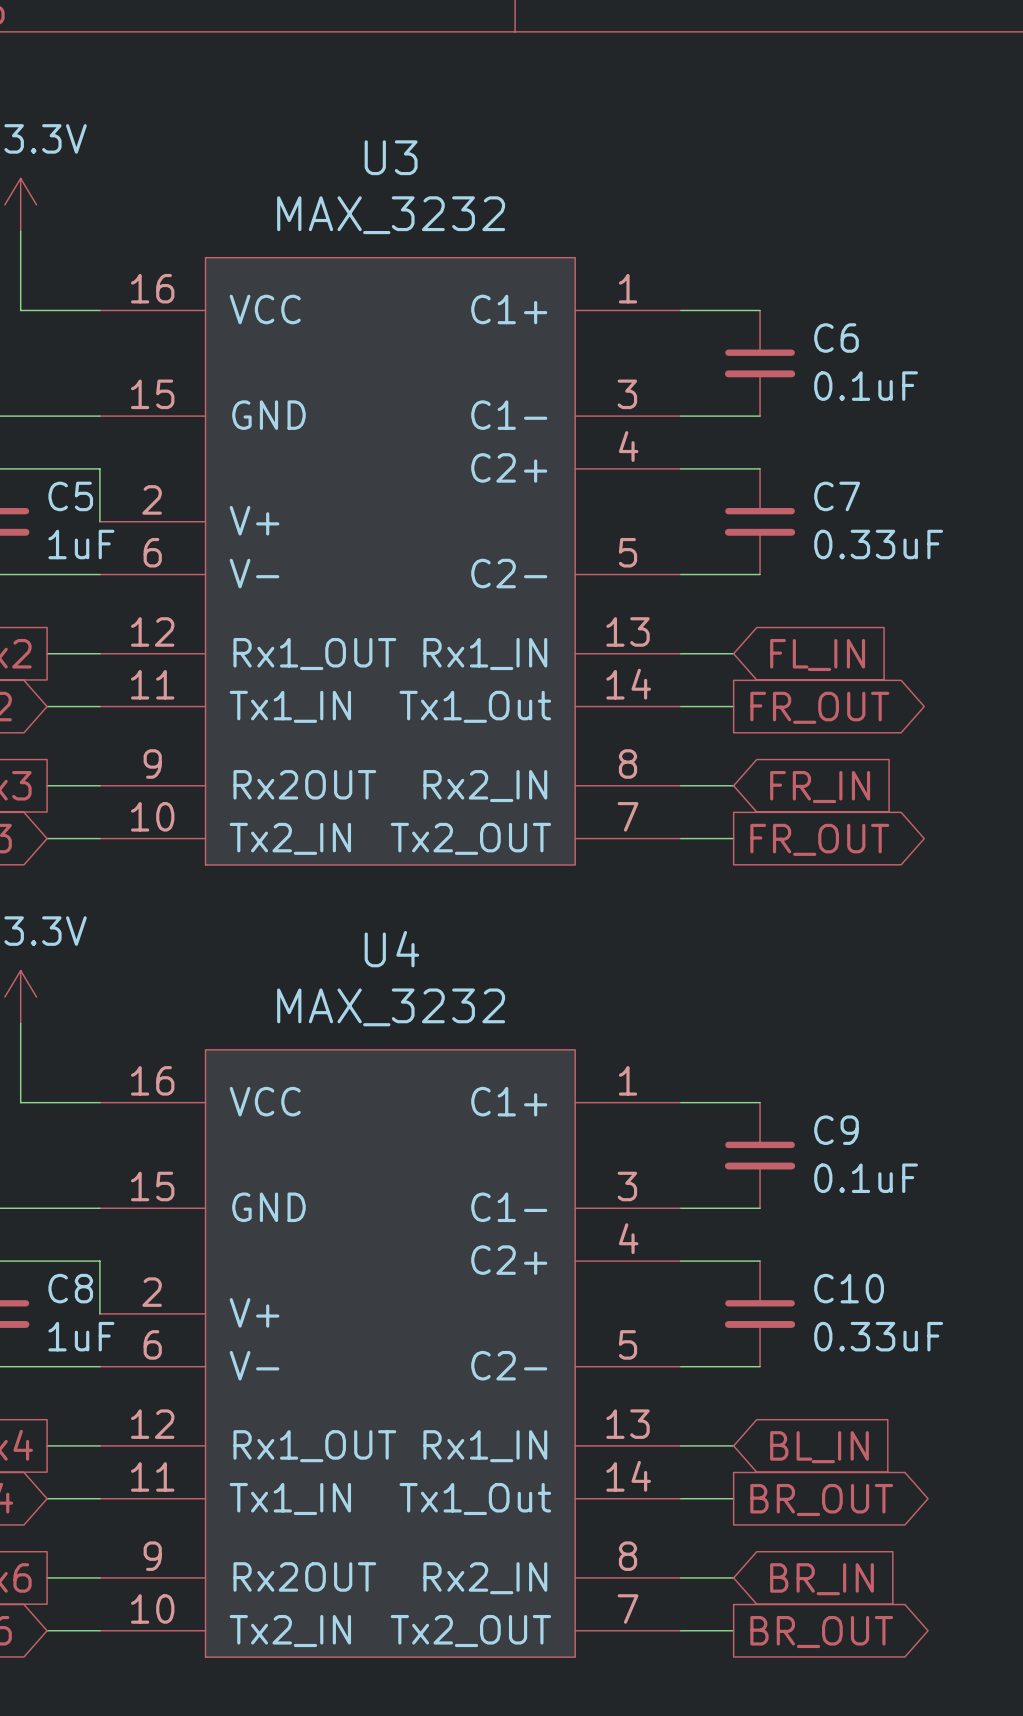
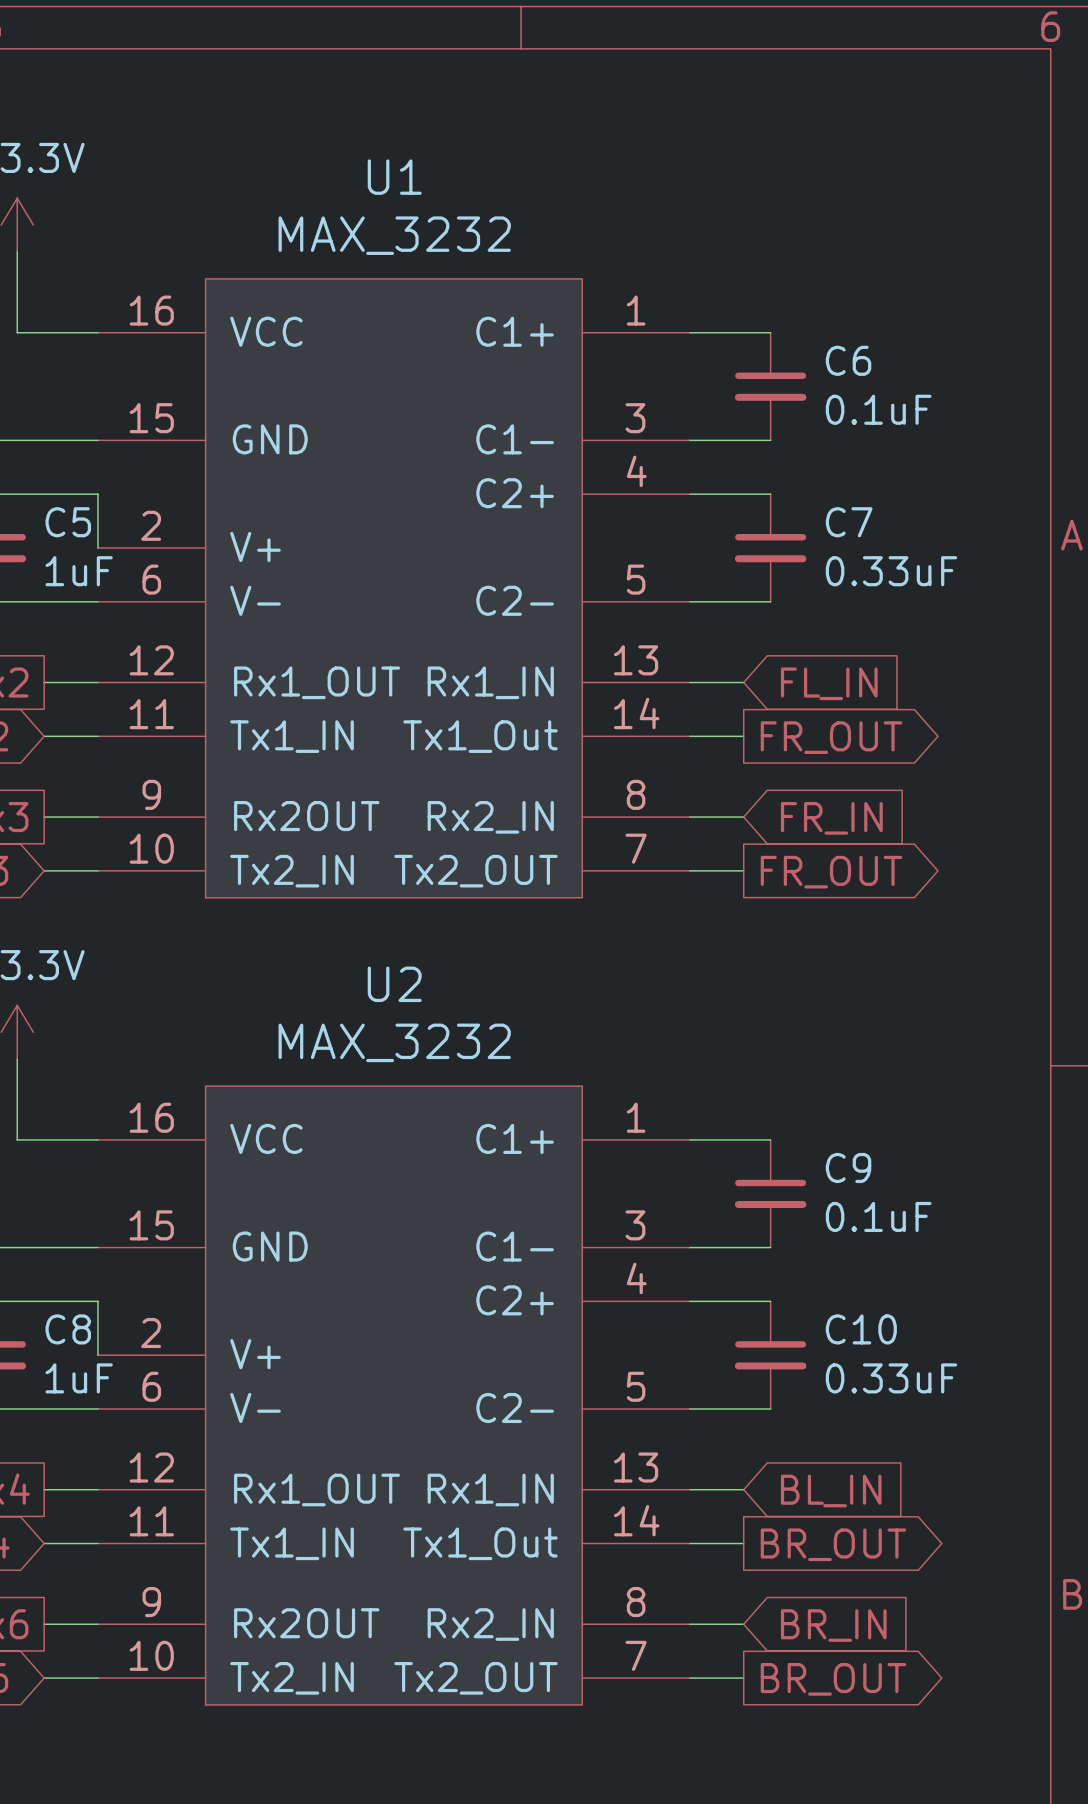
U3 name: U3 (391, 157) -> U1 (394, 177)
U4 name: U4 (391, 949) -> U2 (394, 984)

